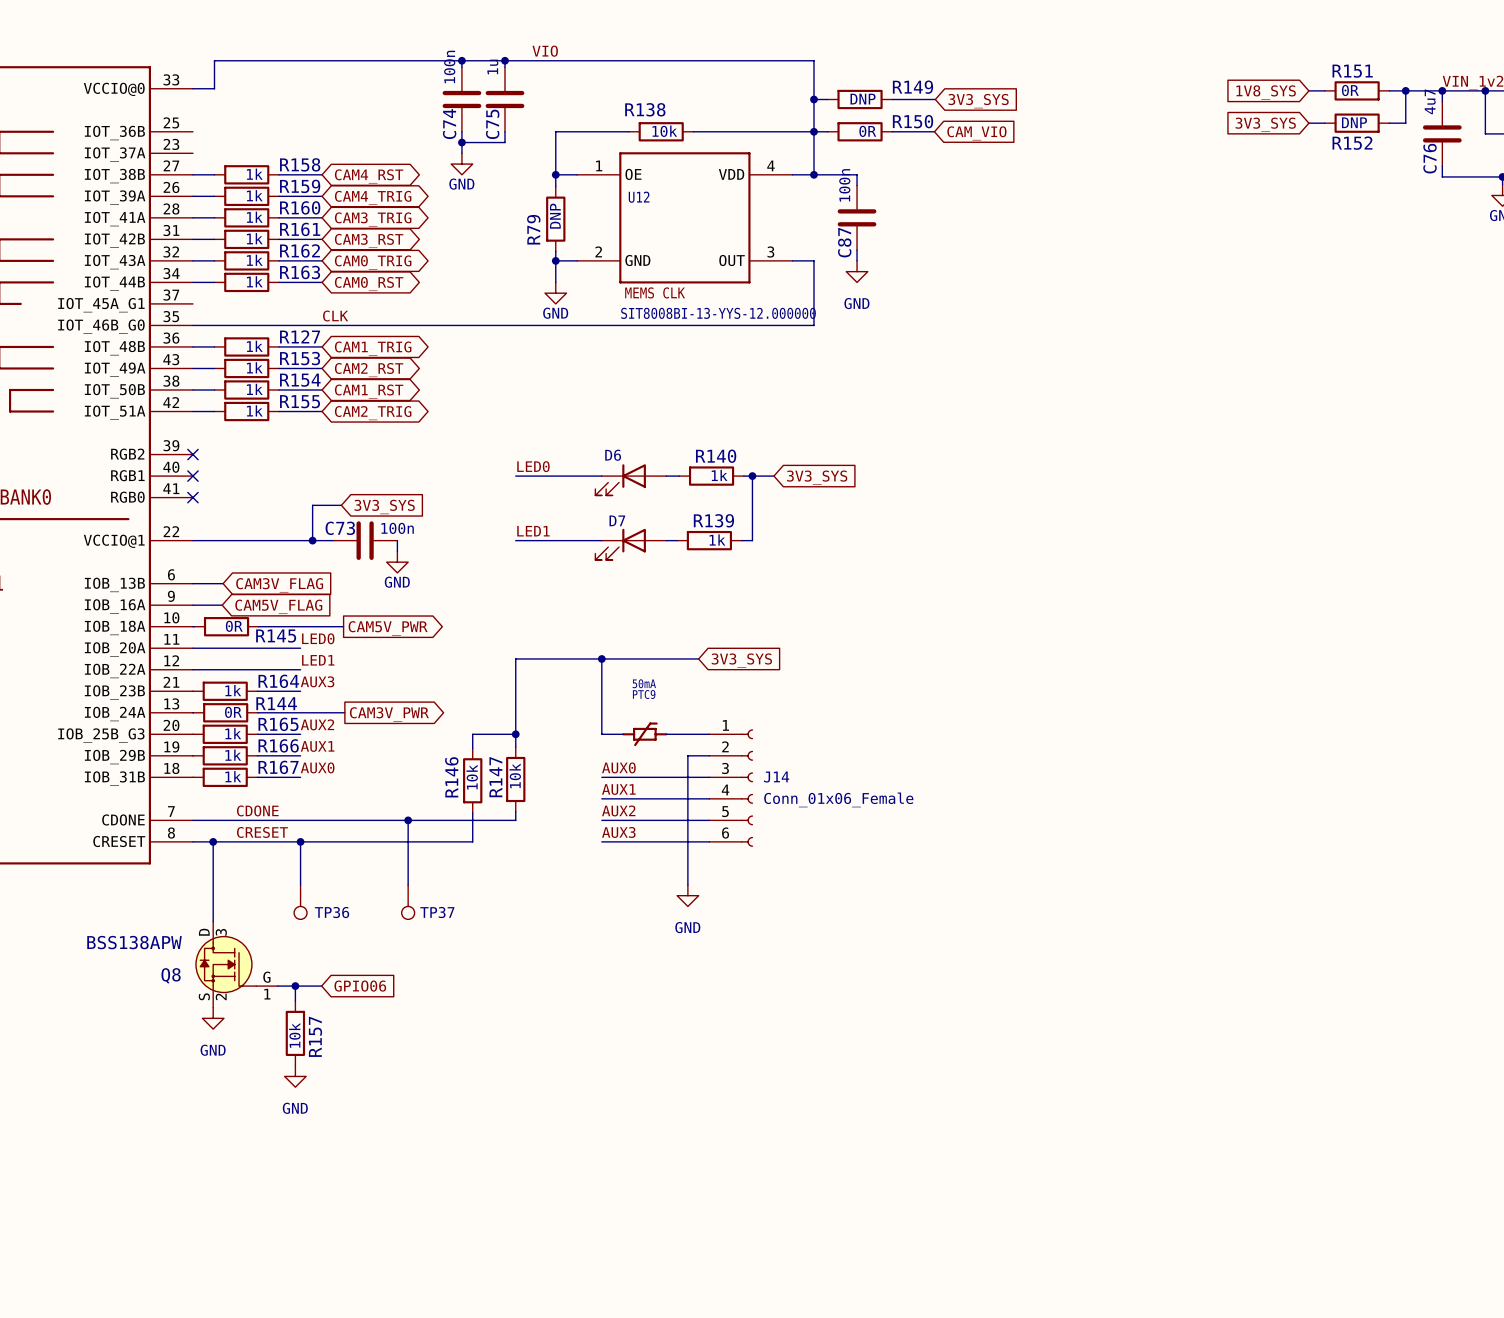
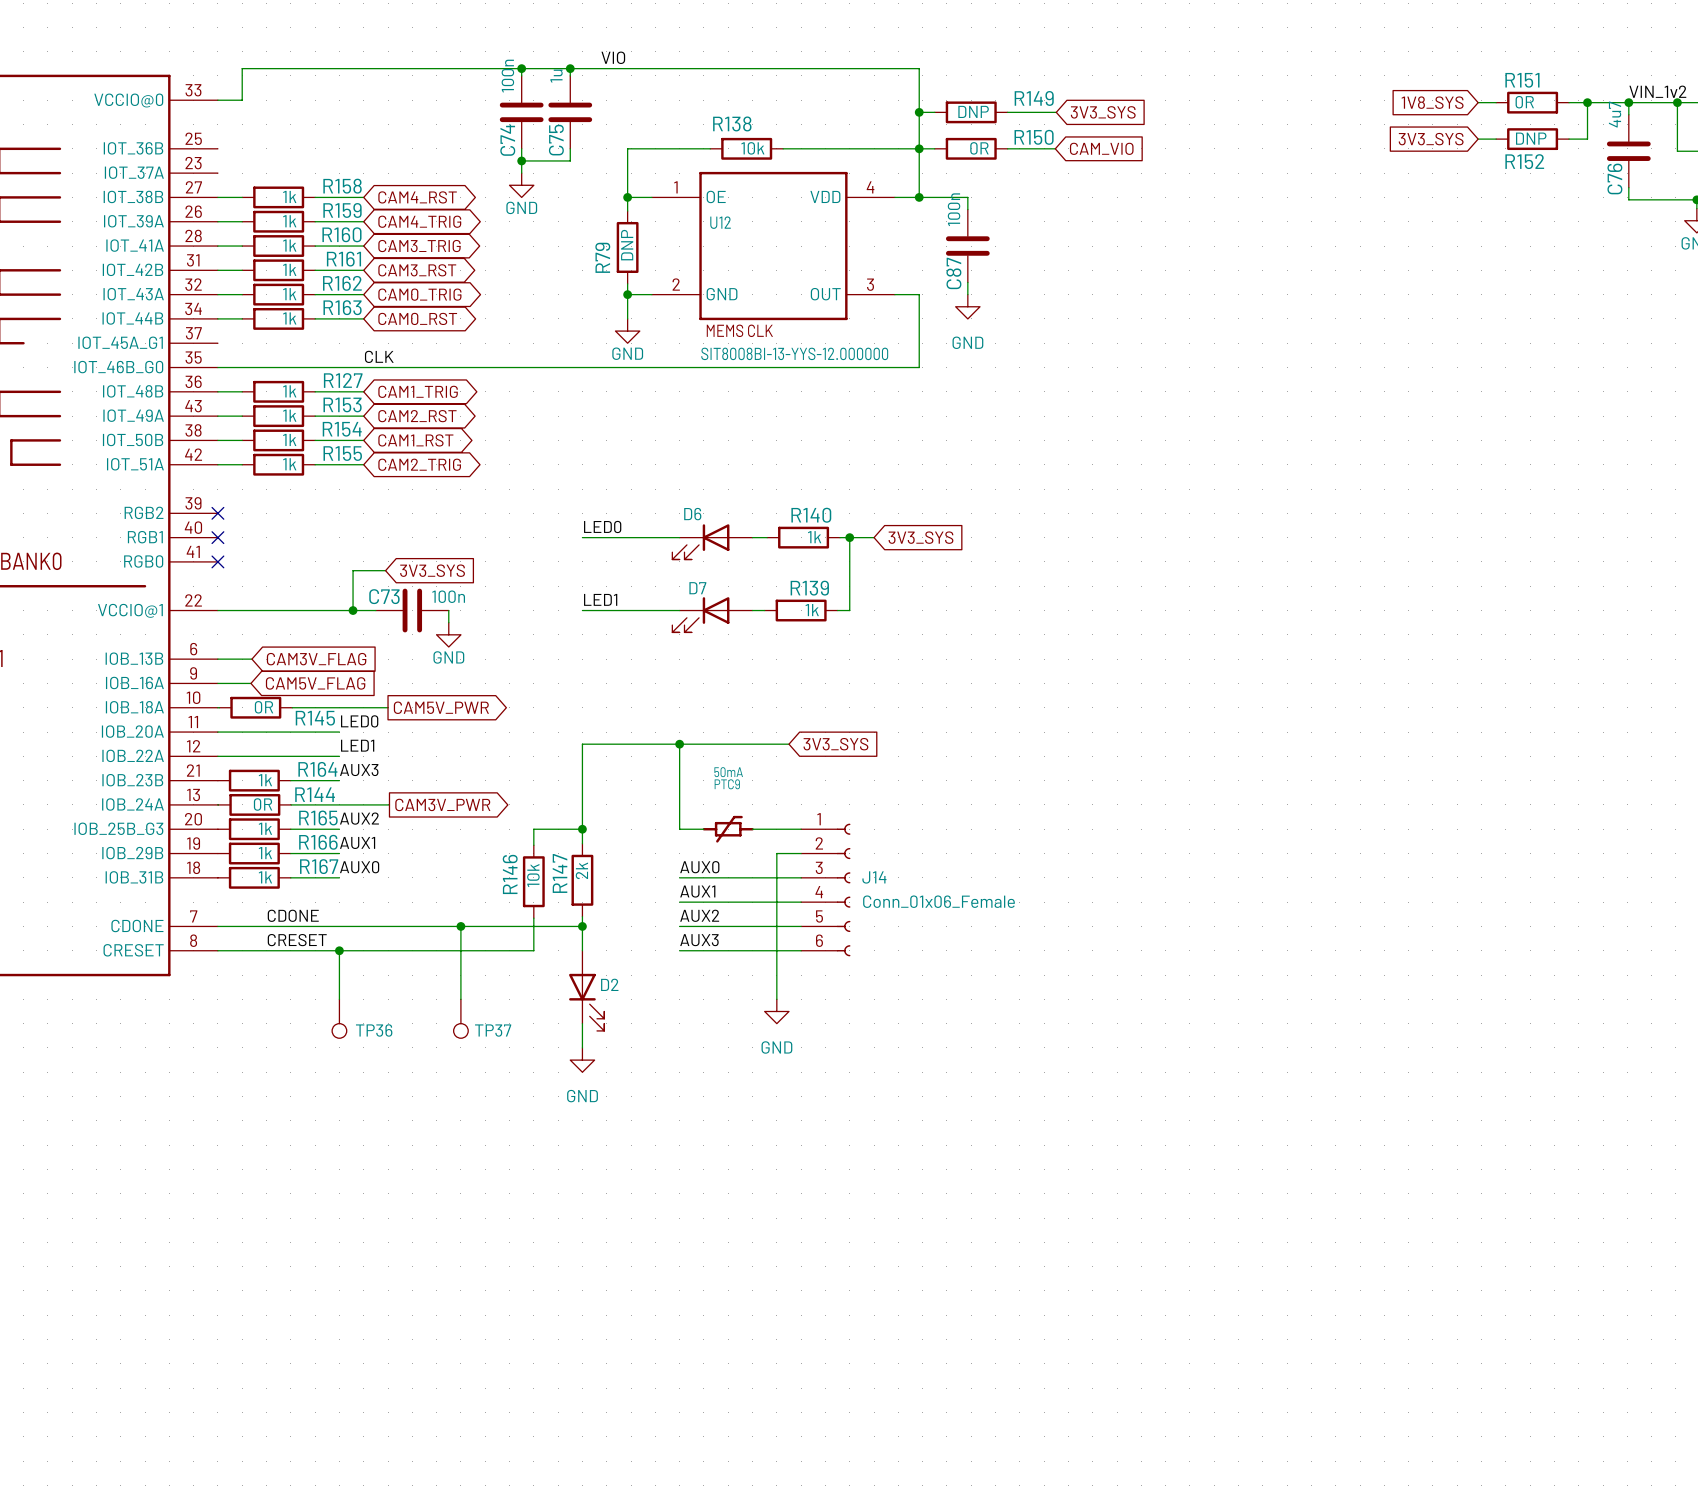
R147 text: 10k (515, 775) -> 2k (581, 870)
wire: none -> (582, 926) (582, 950)
junction: none -> (582, 926)
wire: (213, 841) (213, 921) -> none
junction: (213, 841) -> none
D2: none -> (586, 990)
wire: none -> (582, 1023) (582, 1047)
power symbol: none -> GND (582, 1060)
Q8: BSS138APW (236, 964) -> none
wire: (277, 986) (321, 986) -> none
wire: (295, 986) (295, 1001) -> none
junction: (295, 986) -> none
global label: GPIO06 (360, 986) -> none
power symbol: GND (213, 1018) -> none
R157: (295, 1033) -> none
power symbol: GND (295, 1076) -> none

